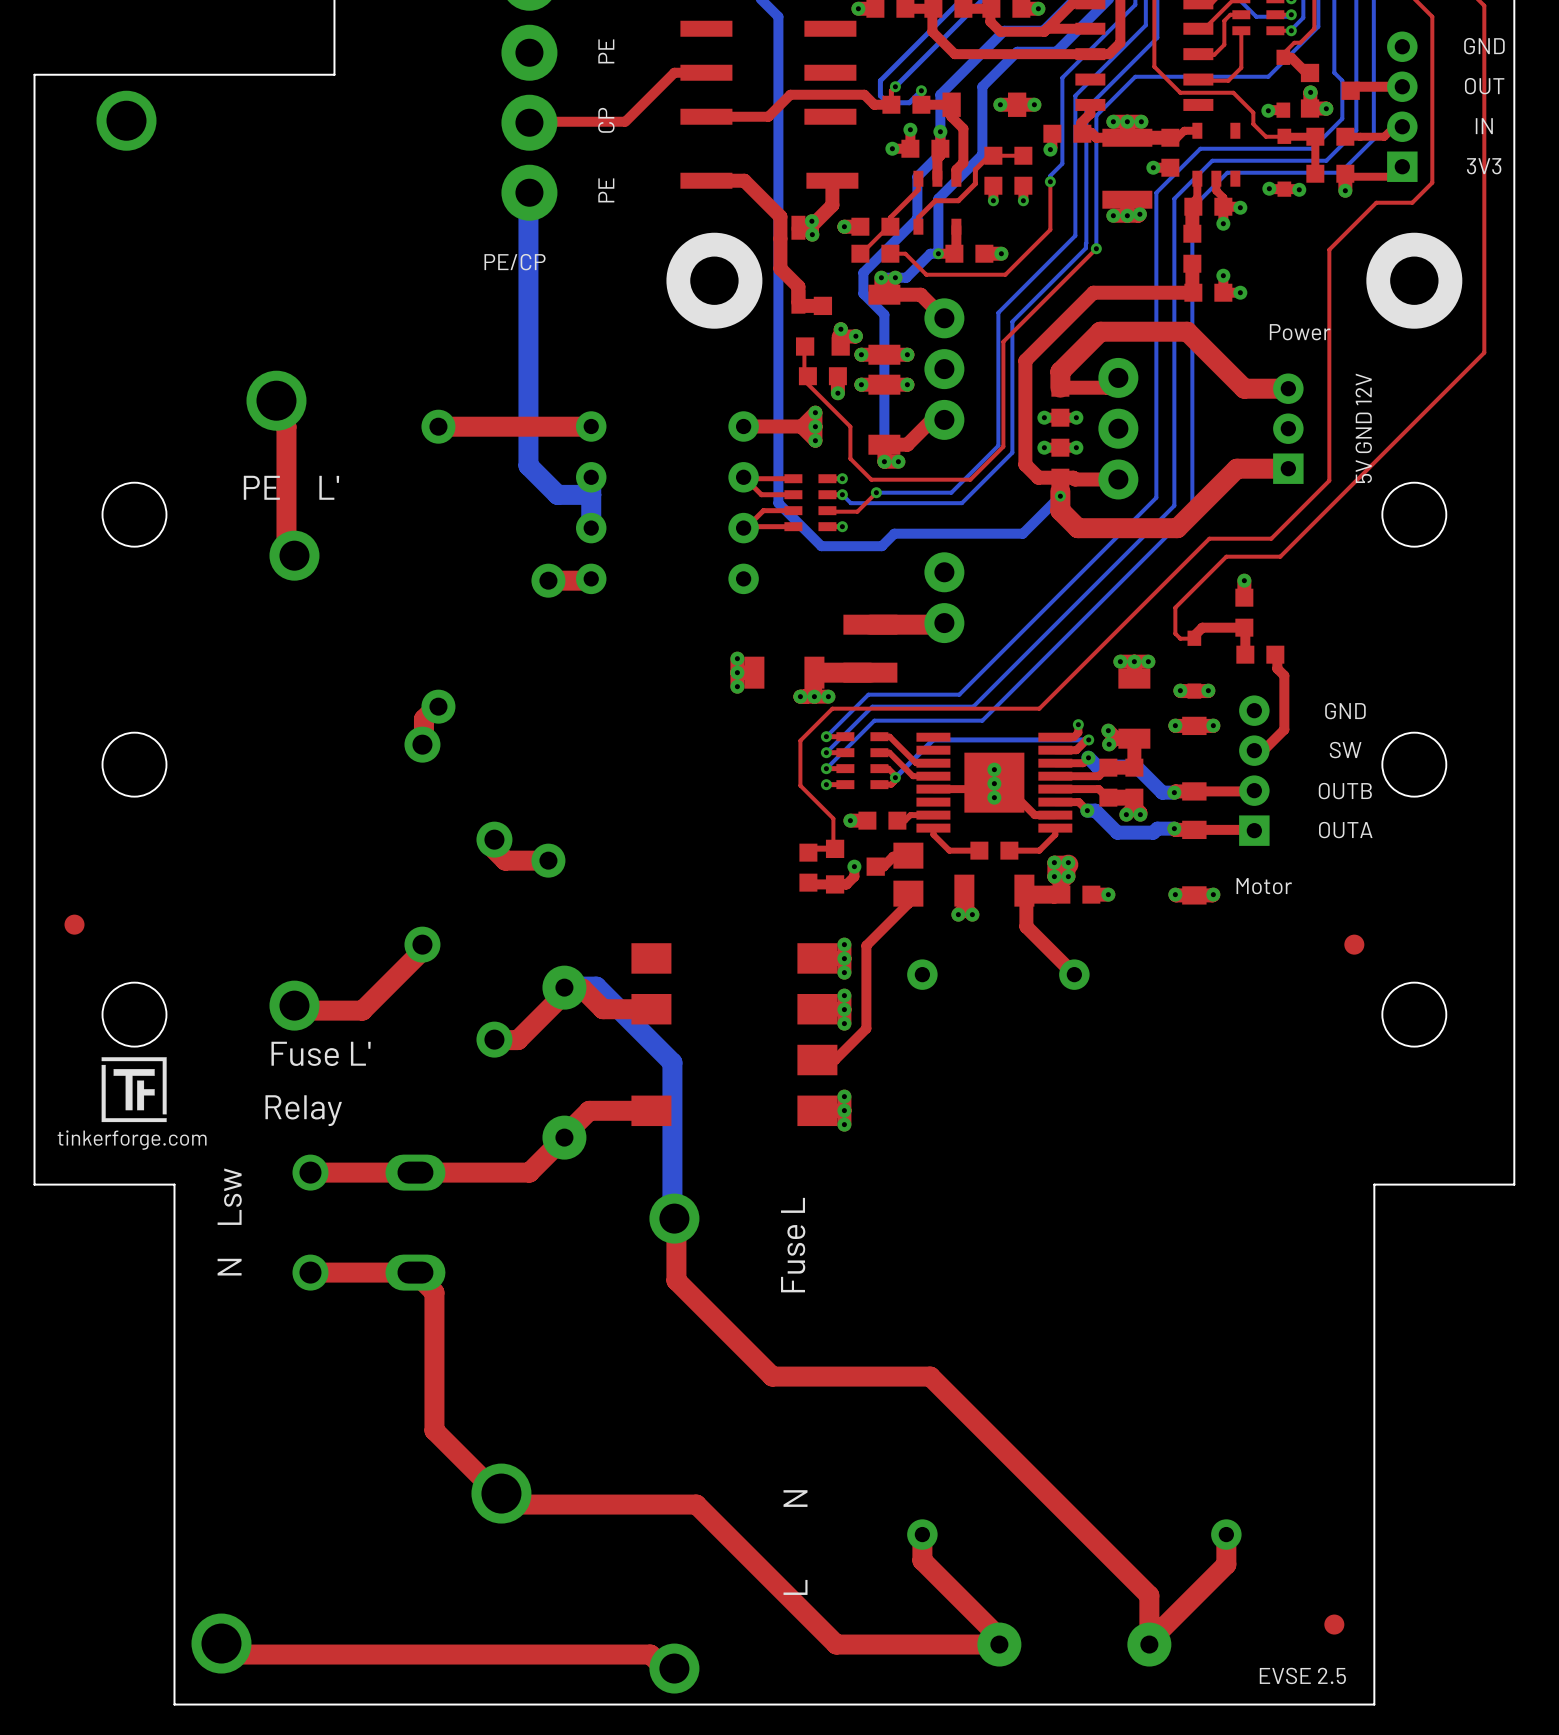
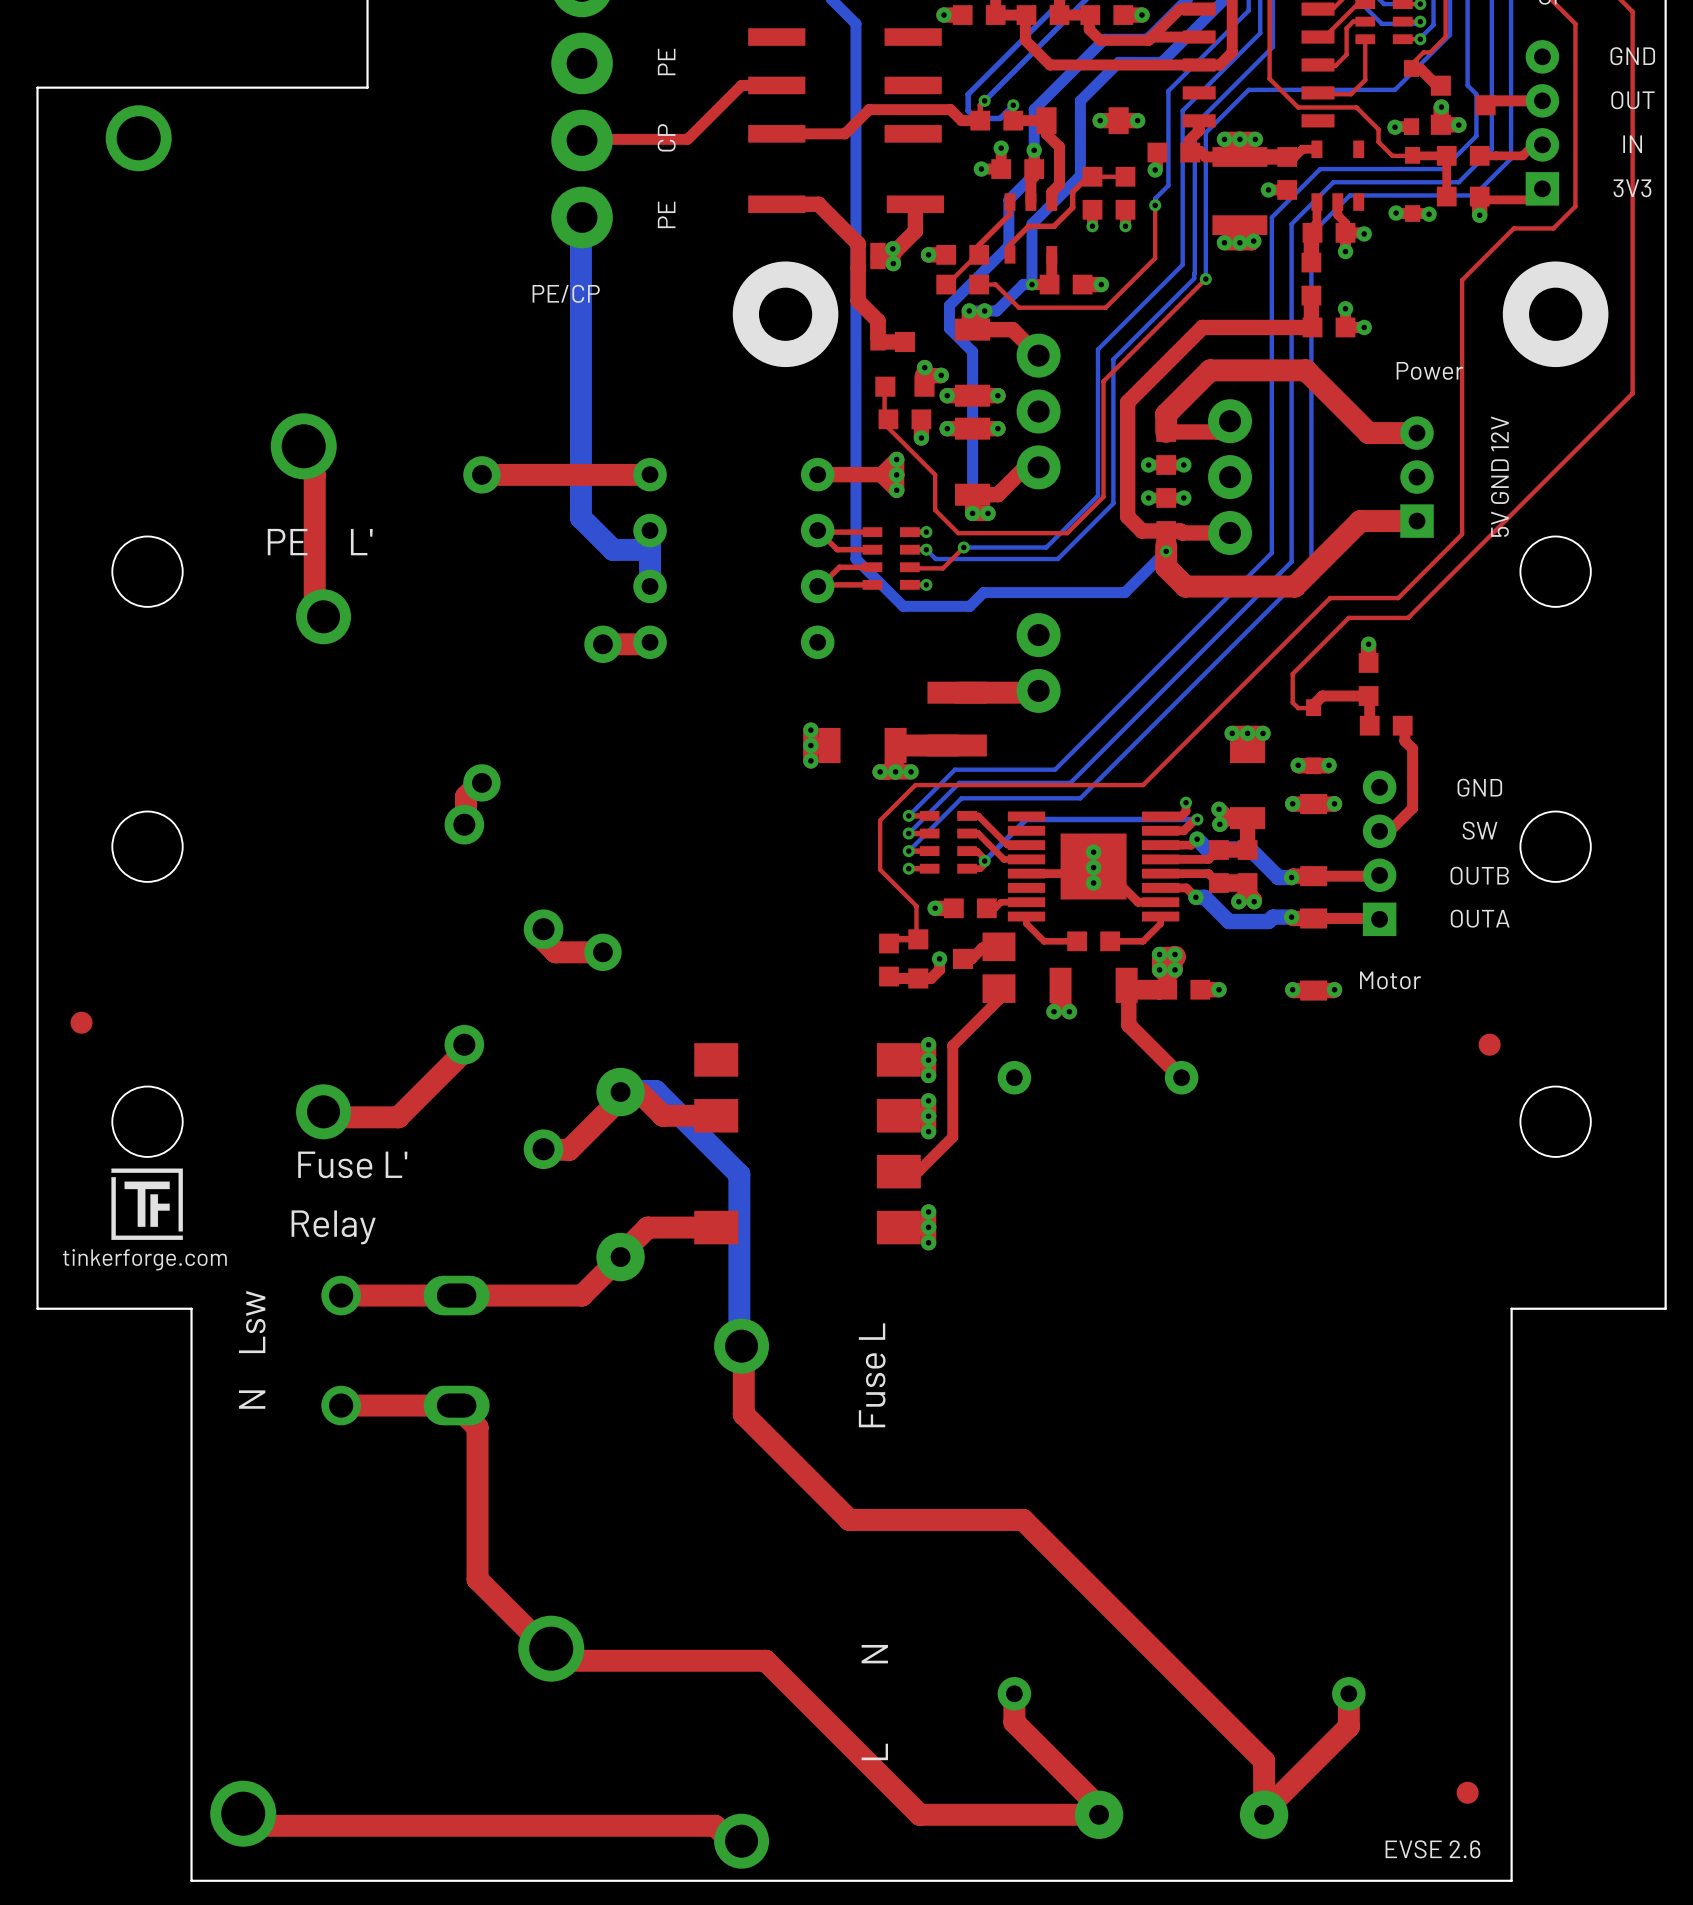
text: EVSE 2.5 (1302, 1675) -> EVSE 2.6 (1432, 1849)

